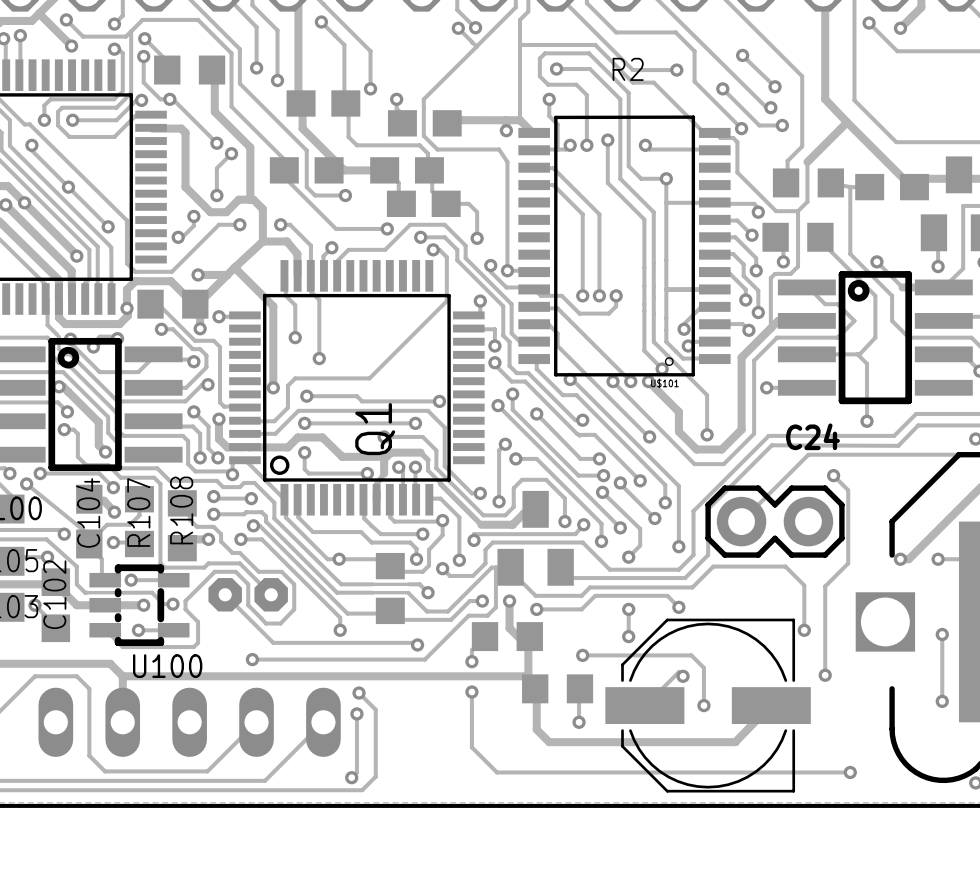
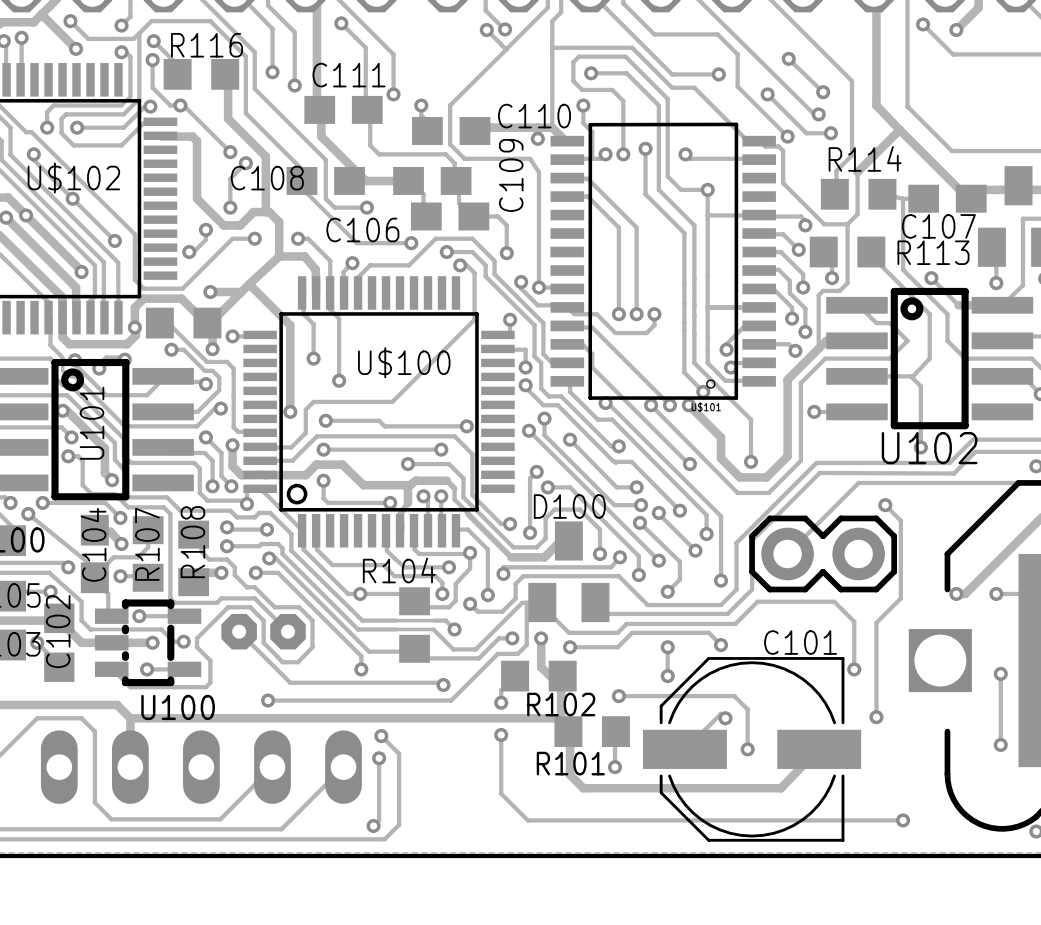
R116 name: none -> R116 (207, 45)
R2: (628, 69) -> none
C111 name: none -> C111 (349, 75)
C110 name: none -> C110 (534, 116)
R114 name: none -> R114 (865, 158)
C109 name: none -> C109 (511, 175)
U$102 name: none -> U$102 (73, 178)
C108 name: none -> C108 (267, 178)
C107 name: none -> C107 (938, 226)
C106 name: none -> C106 (362, 229)
R113 name: none -> R113 (933, 252)
U$100 name: none -> U$100 (404, 362)
U101 name: none -> U101 (91, 423)
U102 name: none -> U102 (929, 448)
Q1: (375, 429) -> none
C24: (812, 436) -> none
D100 name: none -> D100 (569, 506)
R104 name: none -> R104 (399, 570)
C101 name: none -> C101 (800, 642)
R102 name: none -> R102 (561, 704)
R101 name: none -> R101 (570, 763)

